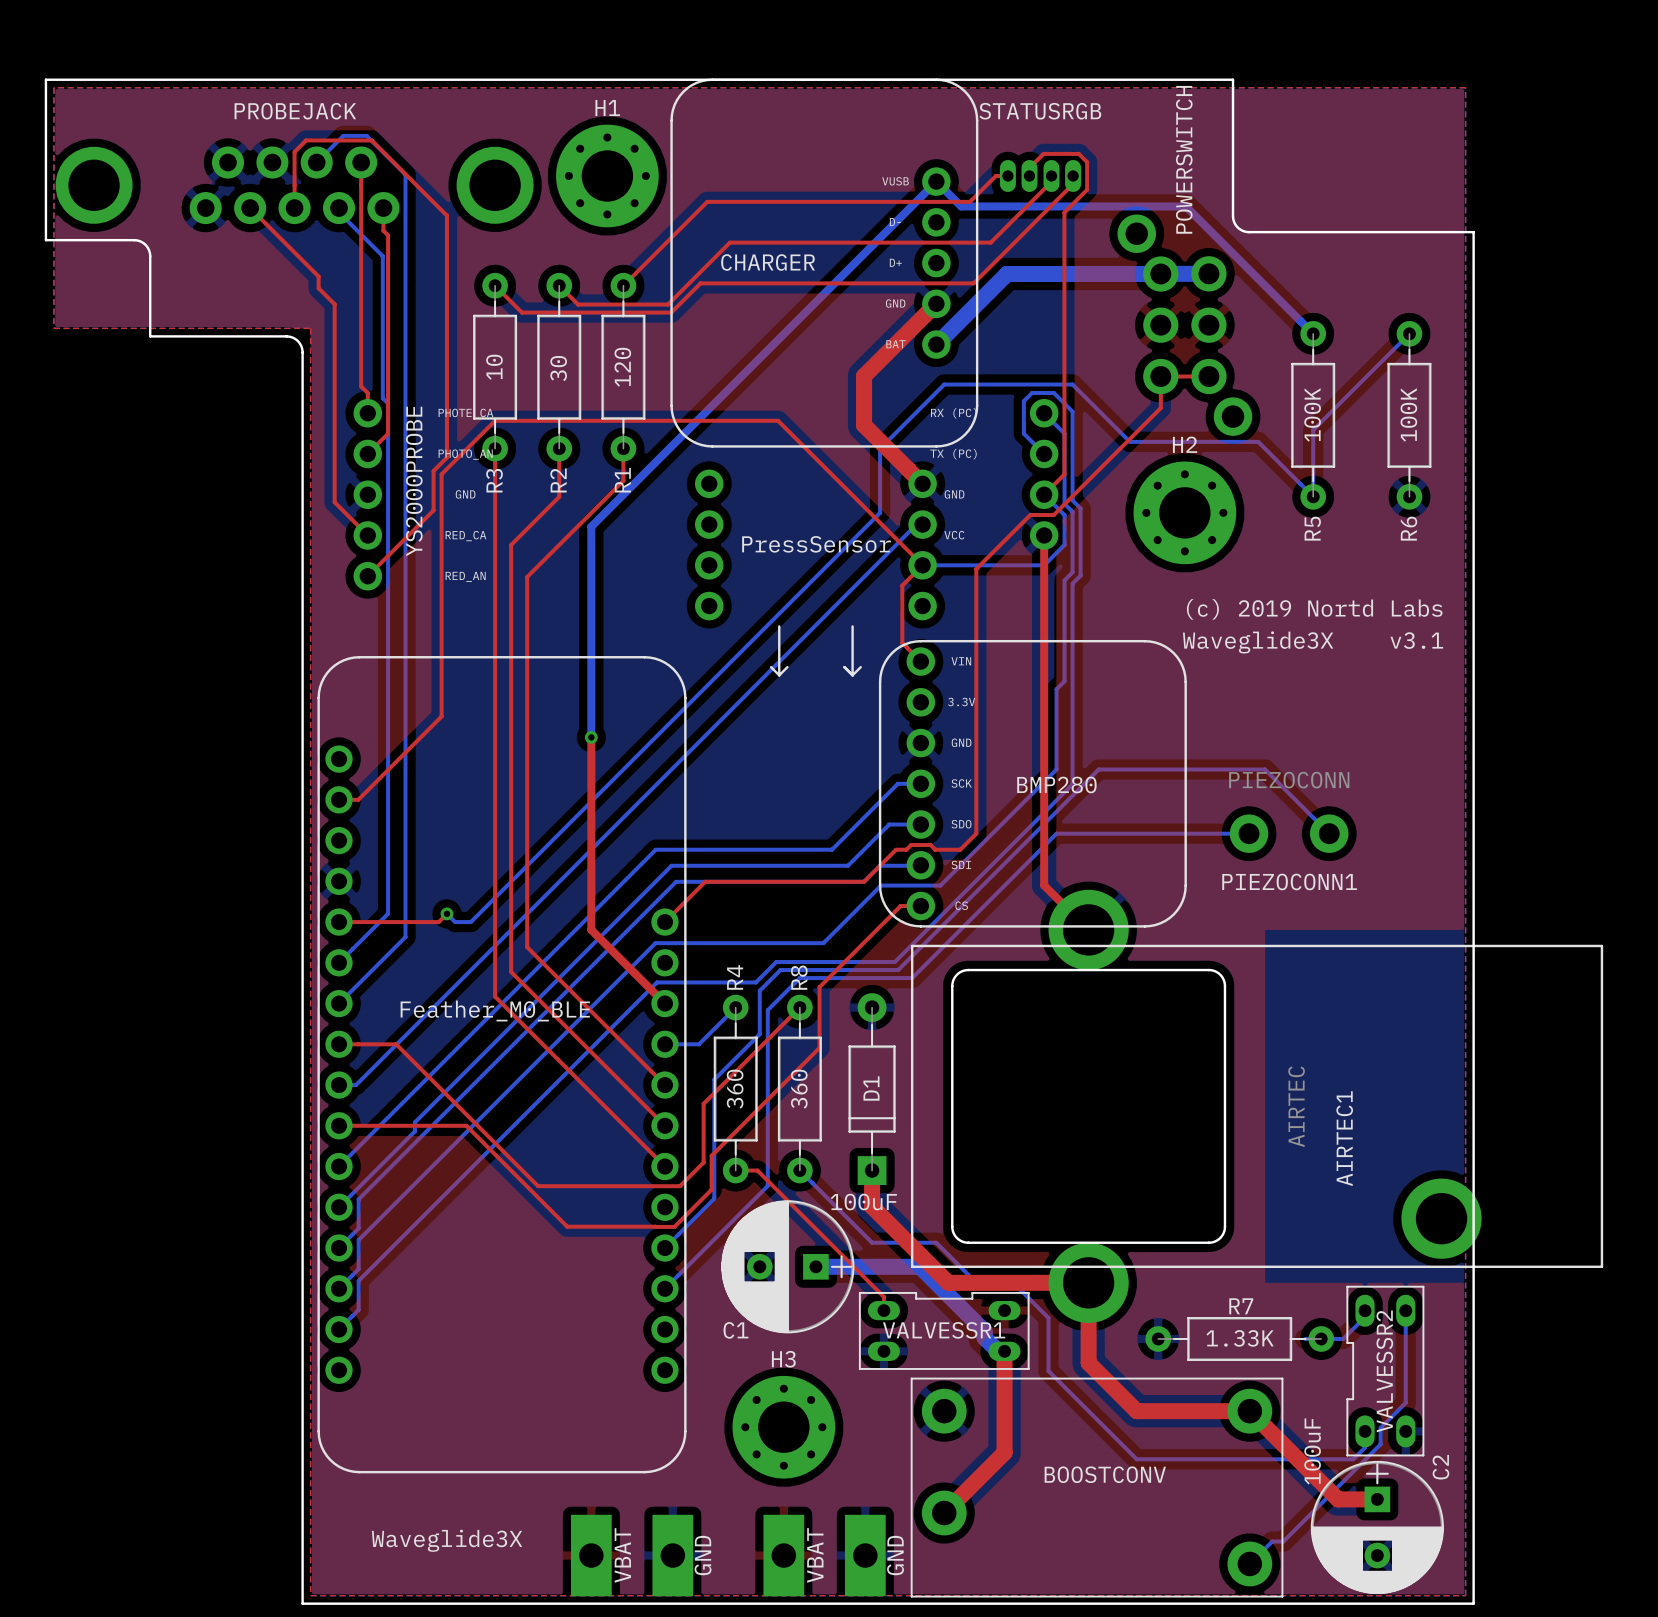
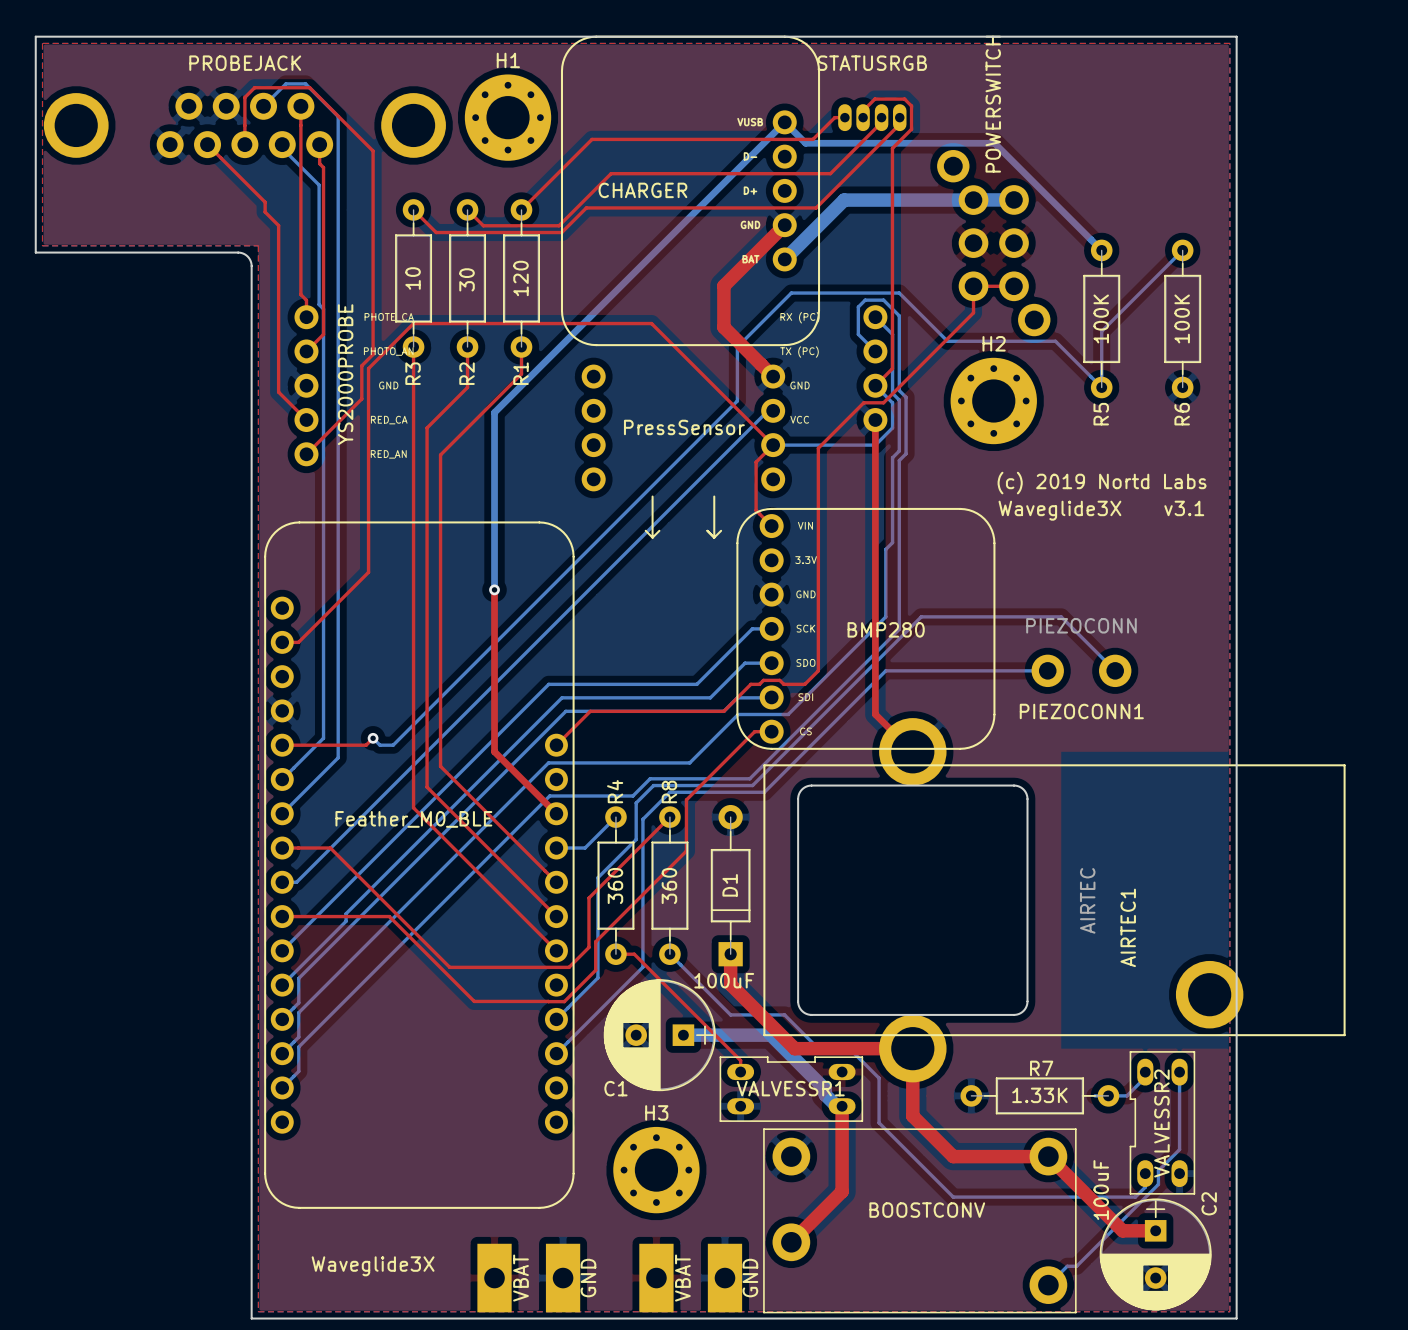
board edge: (1233, 79) (1233, 216) (1235, 224) (1241, 229) (1249, 232) (1473, 232) -> (1034, 36) (1236, 36) (1236, 164)
board edge: (45, 240) (134, 240) (145, 244) (150, 256) (150, 336) -> (35, 171) (35, 252) (123, 252)

